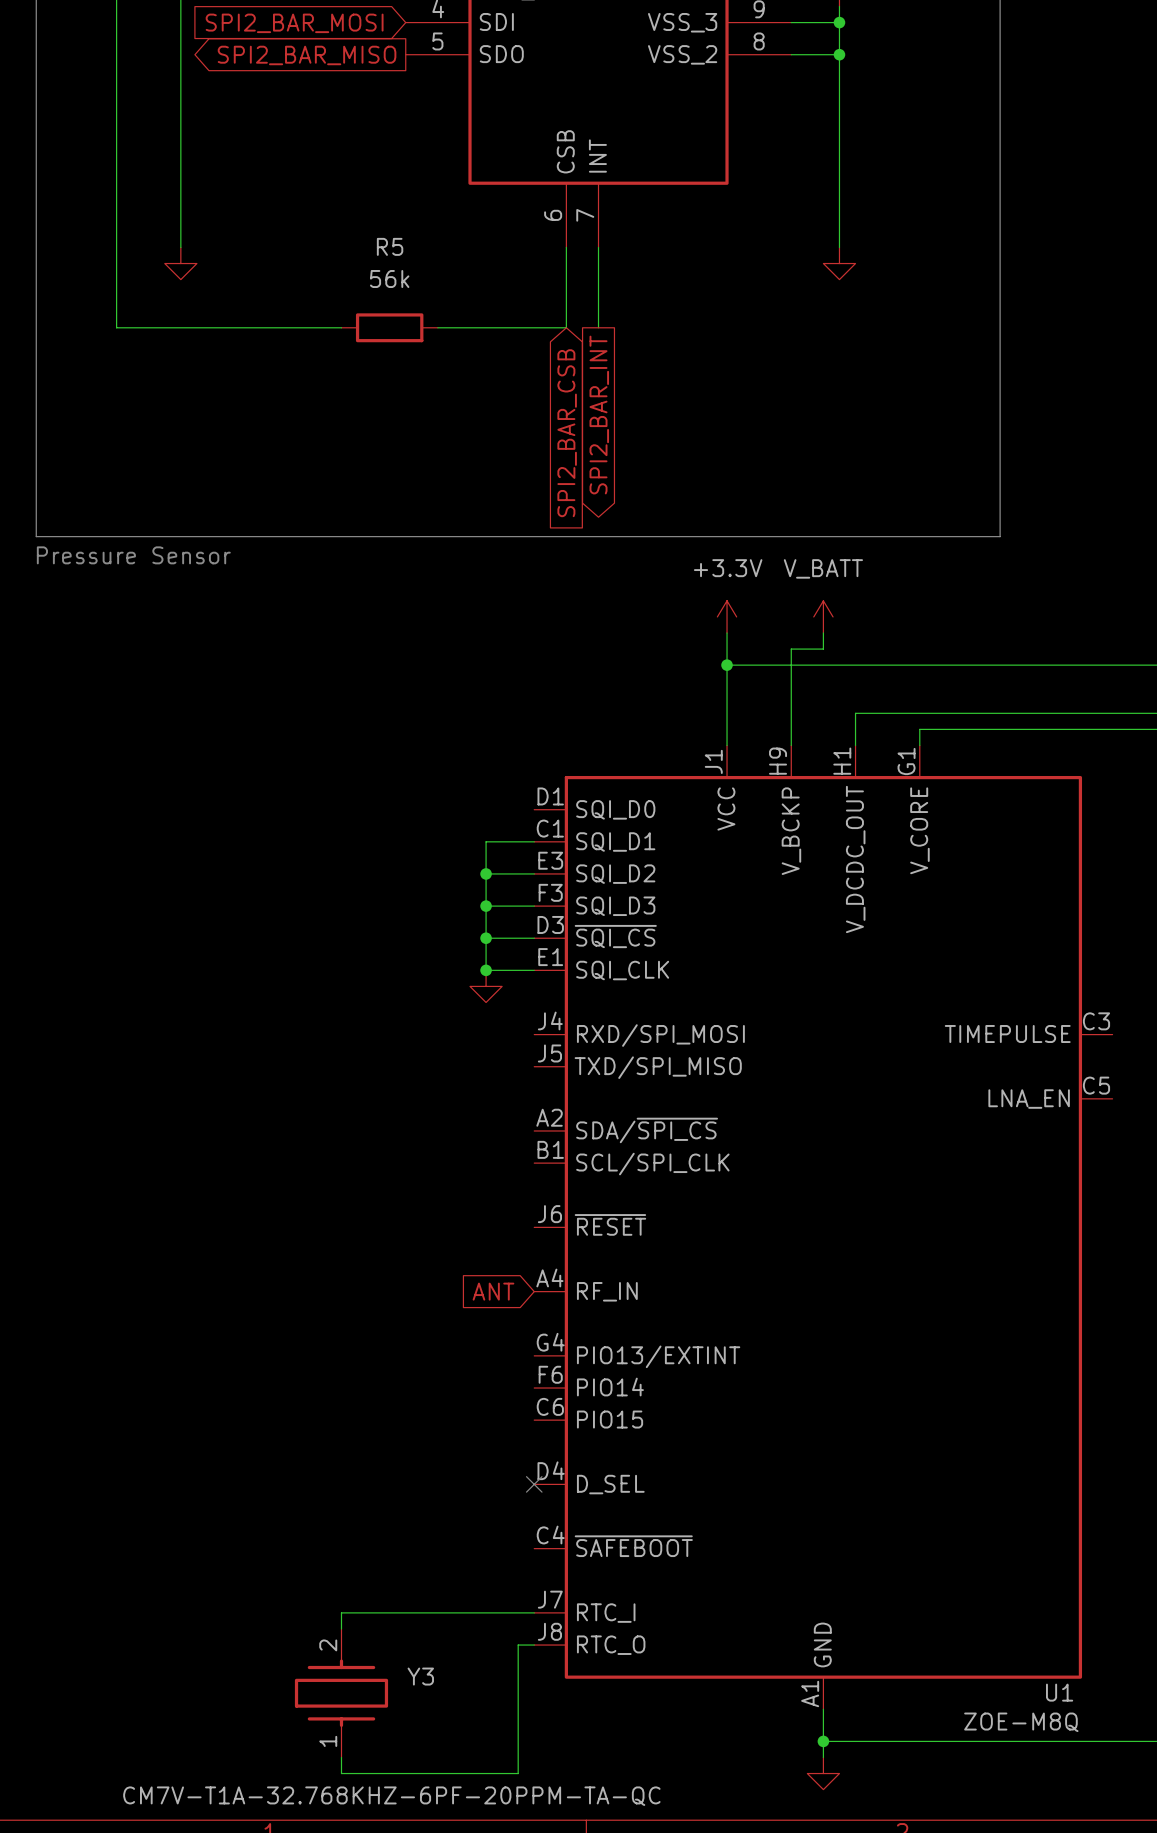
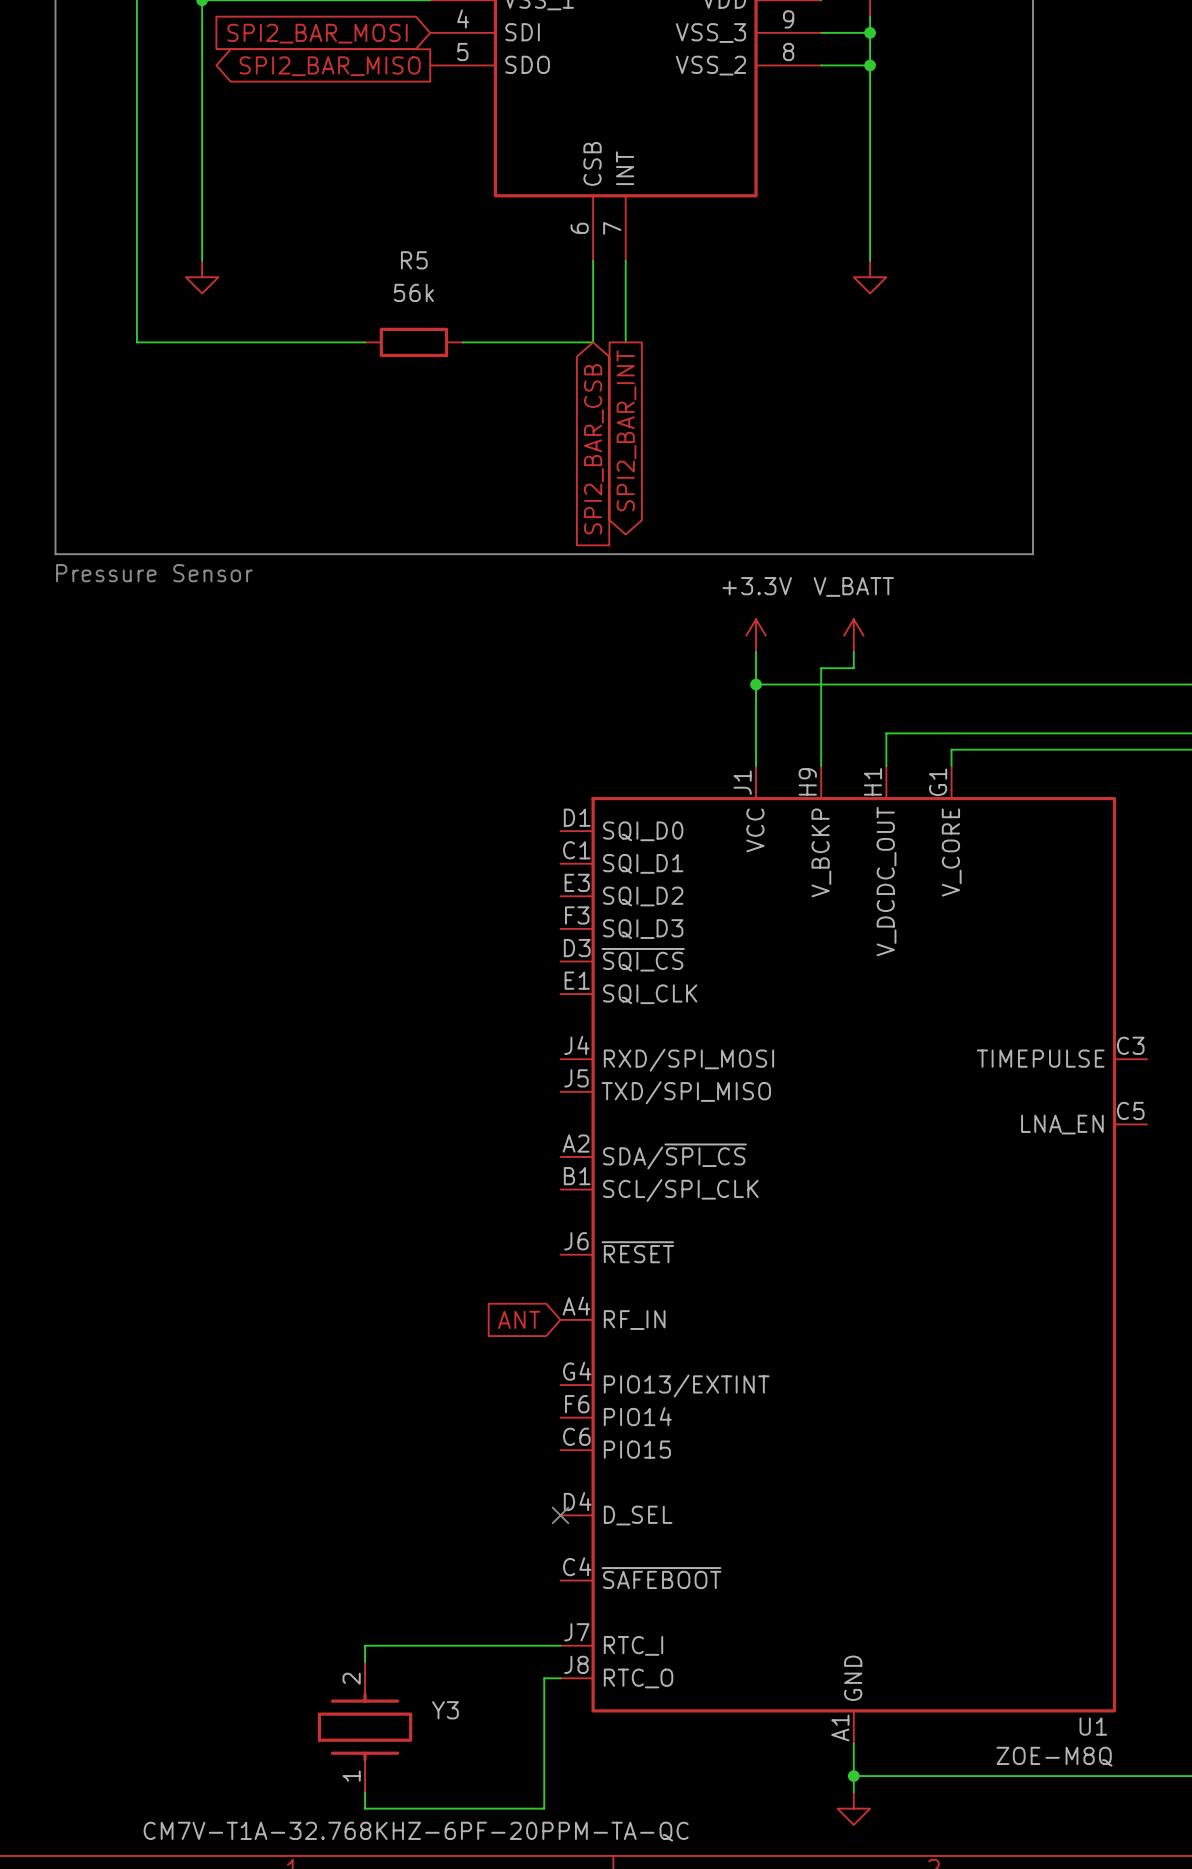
wire: (534, 841) (486, 841) (486, 970) (534, 970) -> none
wire: (486, 873) (534, 873) -> none
junction: (486, 873) -> none
wire: (486, 906) (534, 906) -> none
junction: (486, 906) -> none
wire: (486, 938) (534, 938) -> none
junction: (486, 938) -> none
junction: (486, 970) -> none
power symbol: (486, 986) -> none

